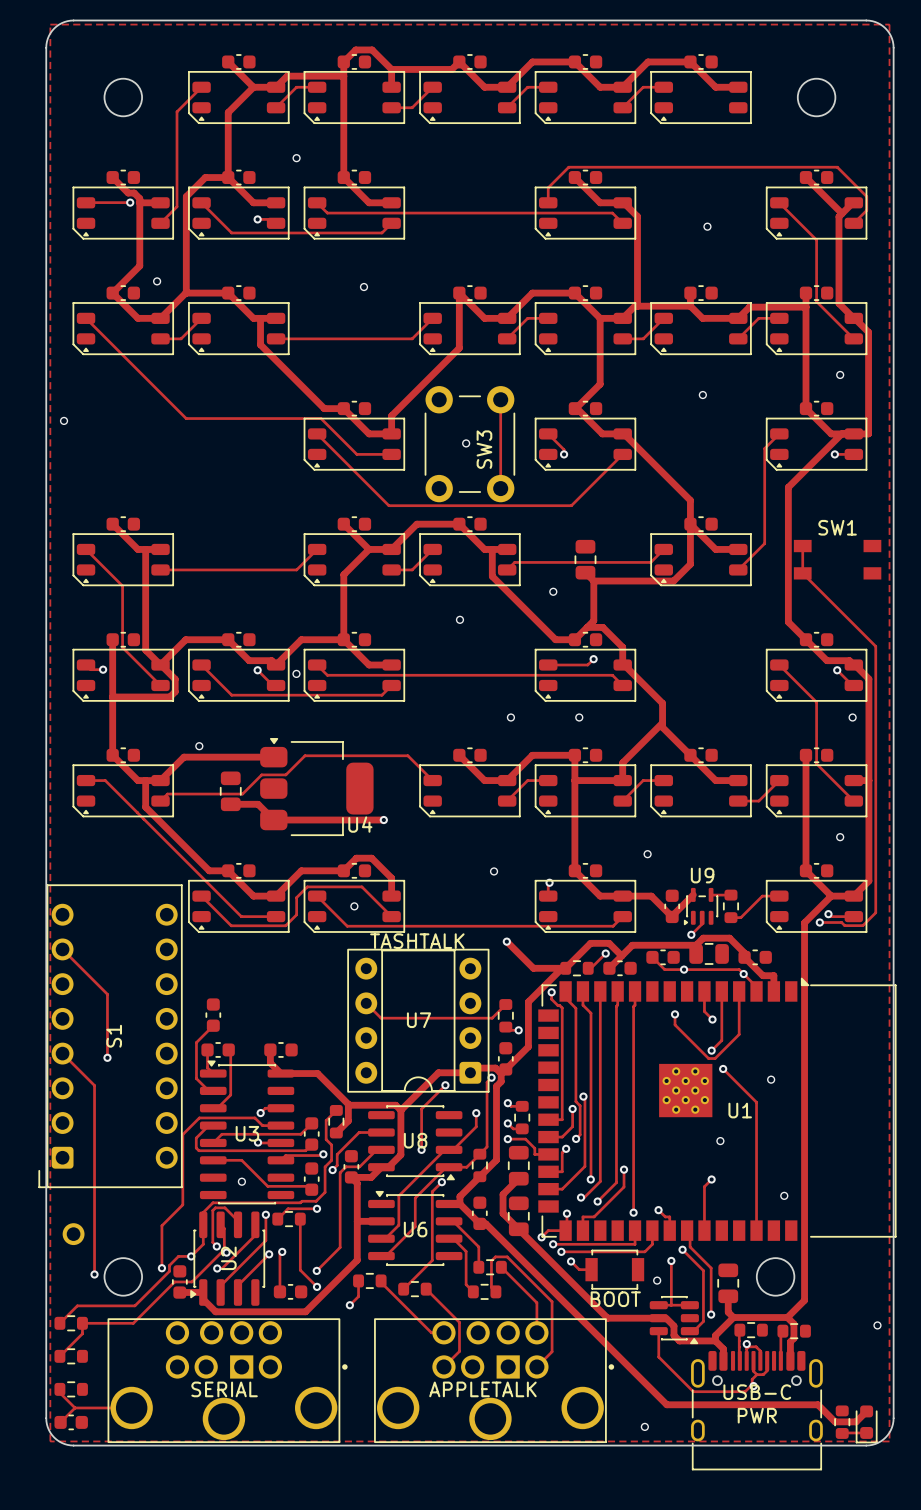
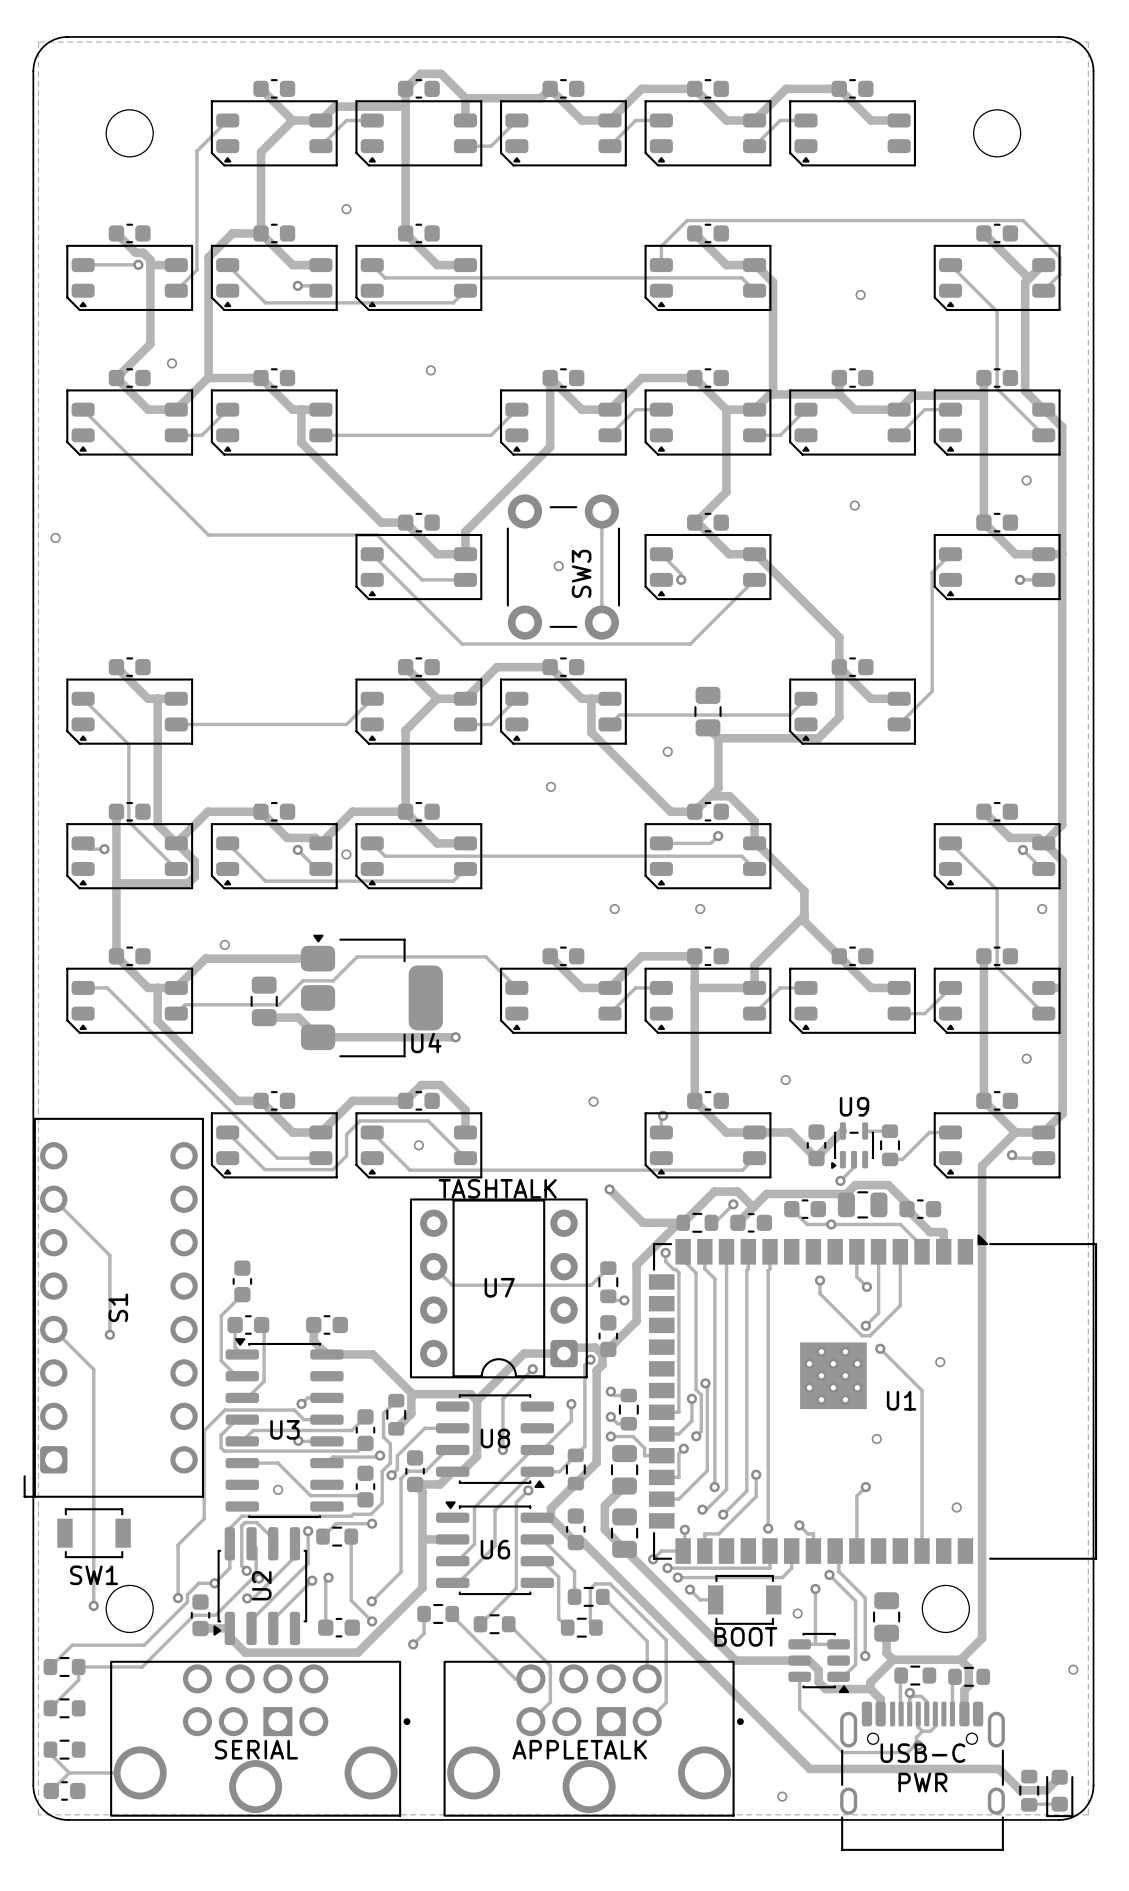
track: (841, 433) (788, 487) (788, 622) (805, 639) -> none
track: none -> (1062, 554) (1062, 824) (1043, 843)
SW1 name position: SW1 (837, 527) -> SW1 (94, 1575)
SW1 footprint: [793, 539, 882, 580] -> [57, 1508, 131, 1559]
track: (802, 546) (802, 573) (875, 646) (875, 912) (862, 925) (844, 925) (841, 922) (819, 922) -> none
via: (819, 922) -> none
via: (743, 974) -> none
part: (73, 1234) -> none

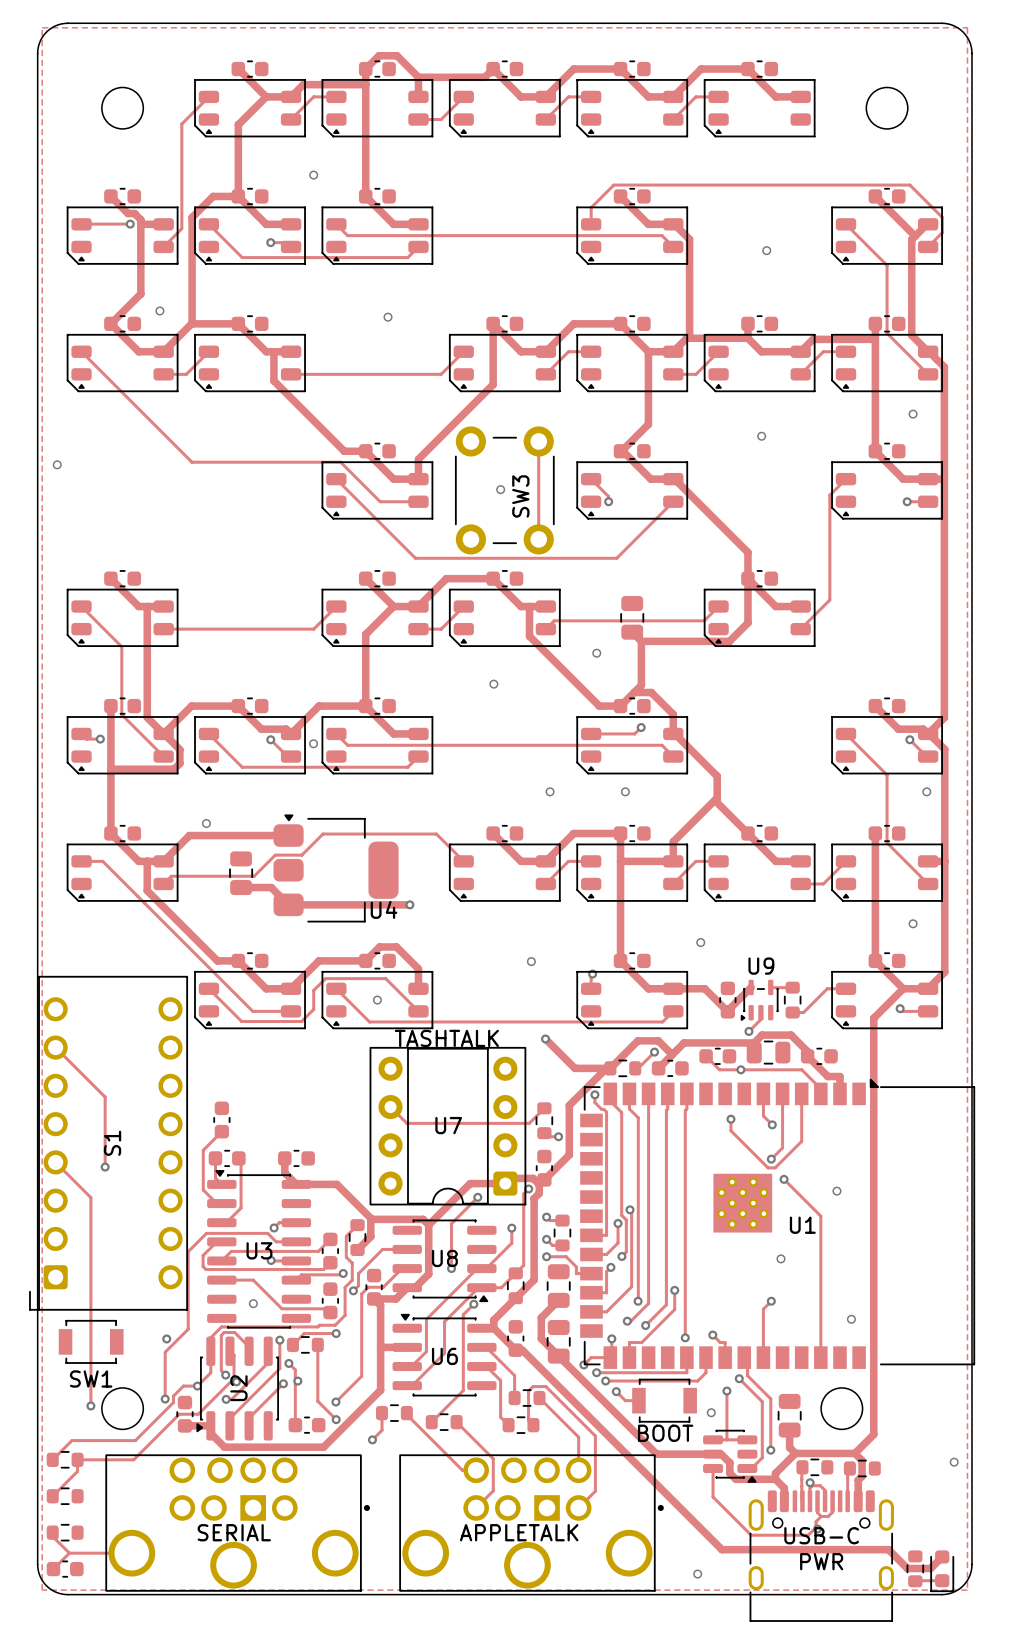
via: none -> (166, 1338)
track: none -> (288, 1363) (295, 1369) (295, 1381)
via: none -> (288, 1363)

